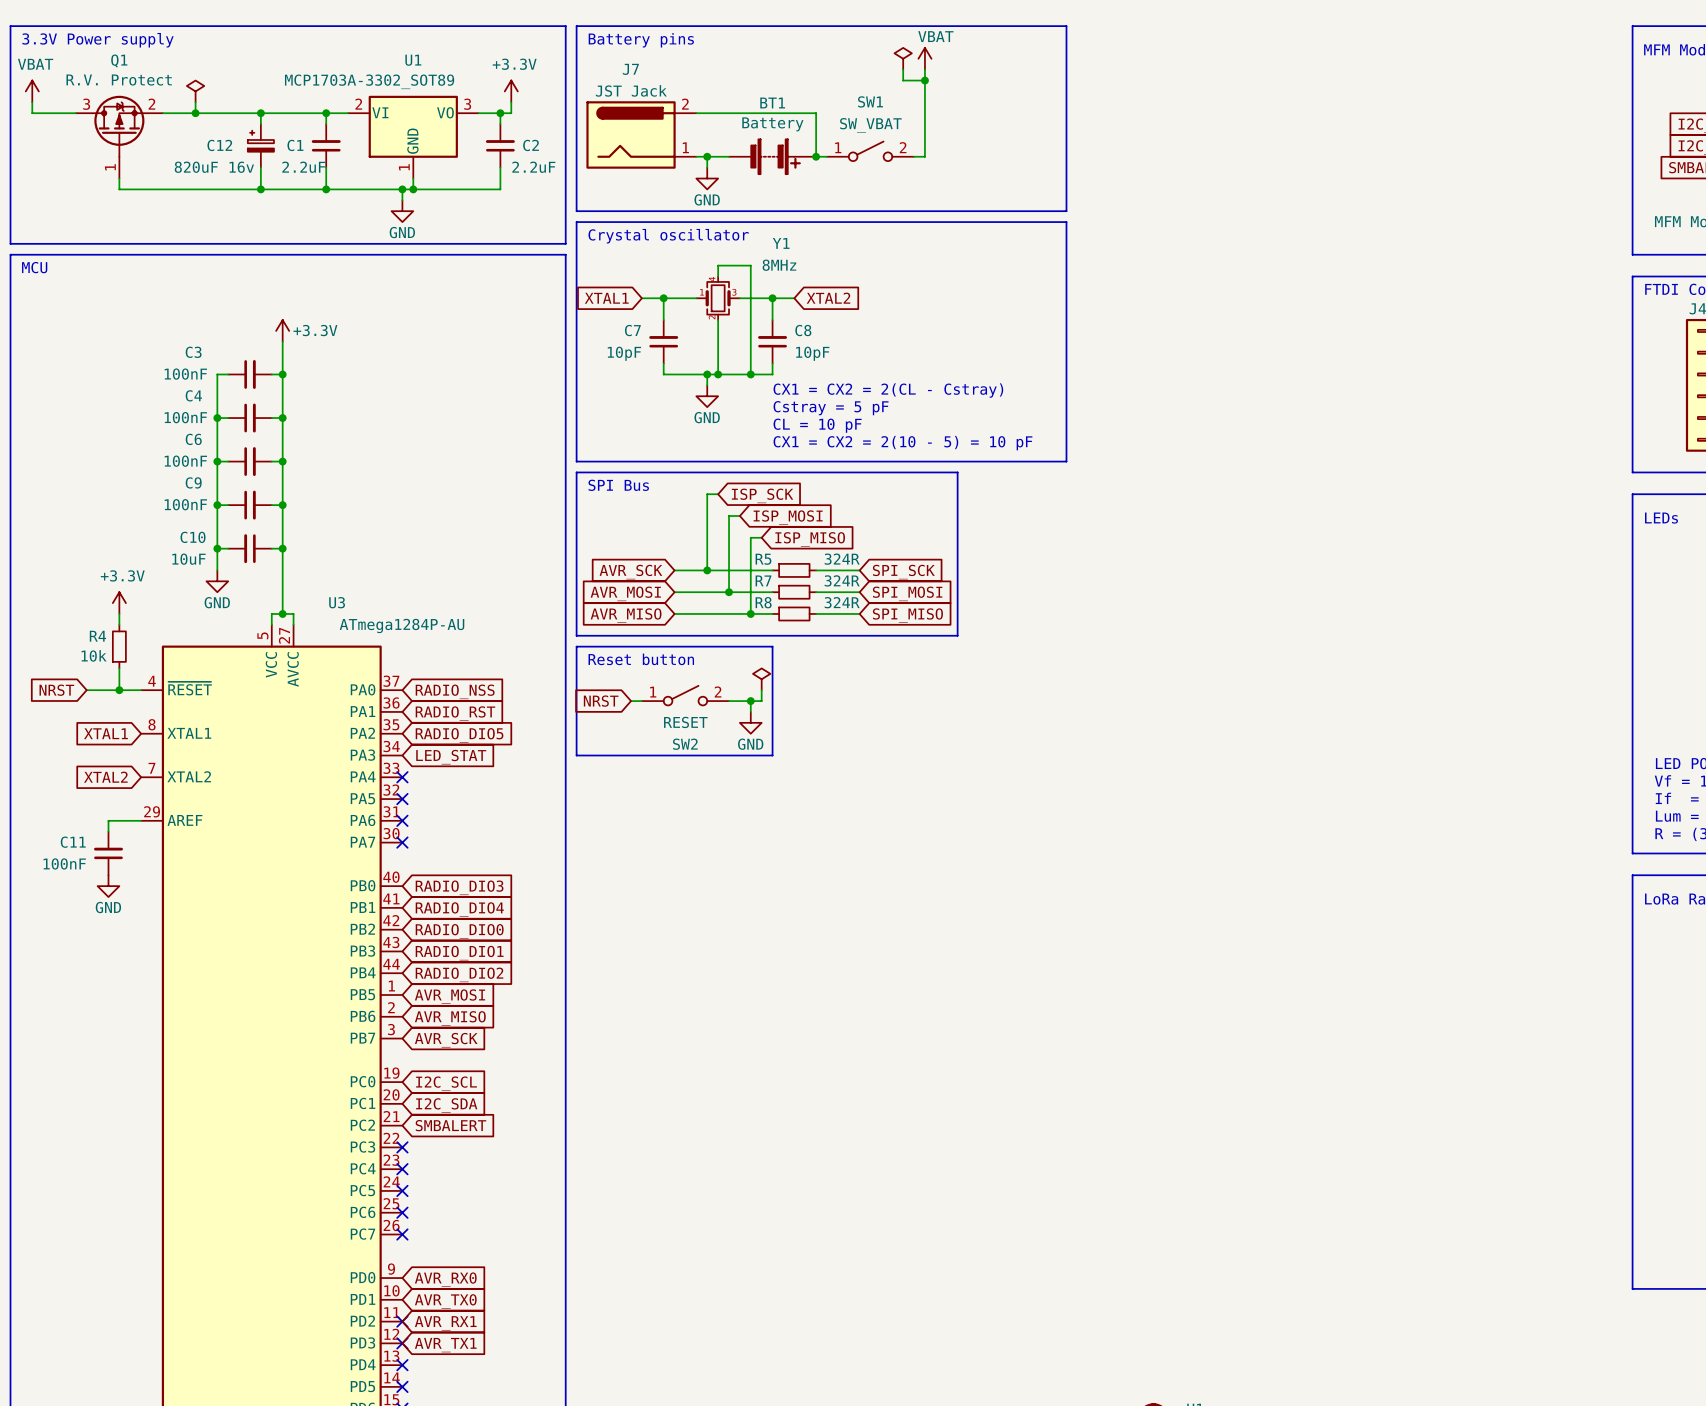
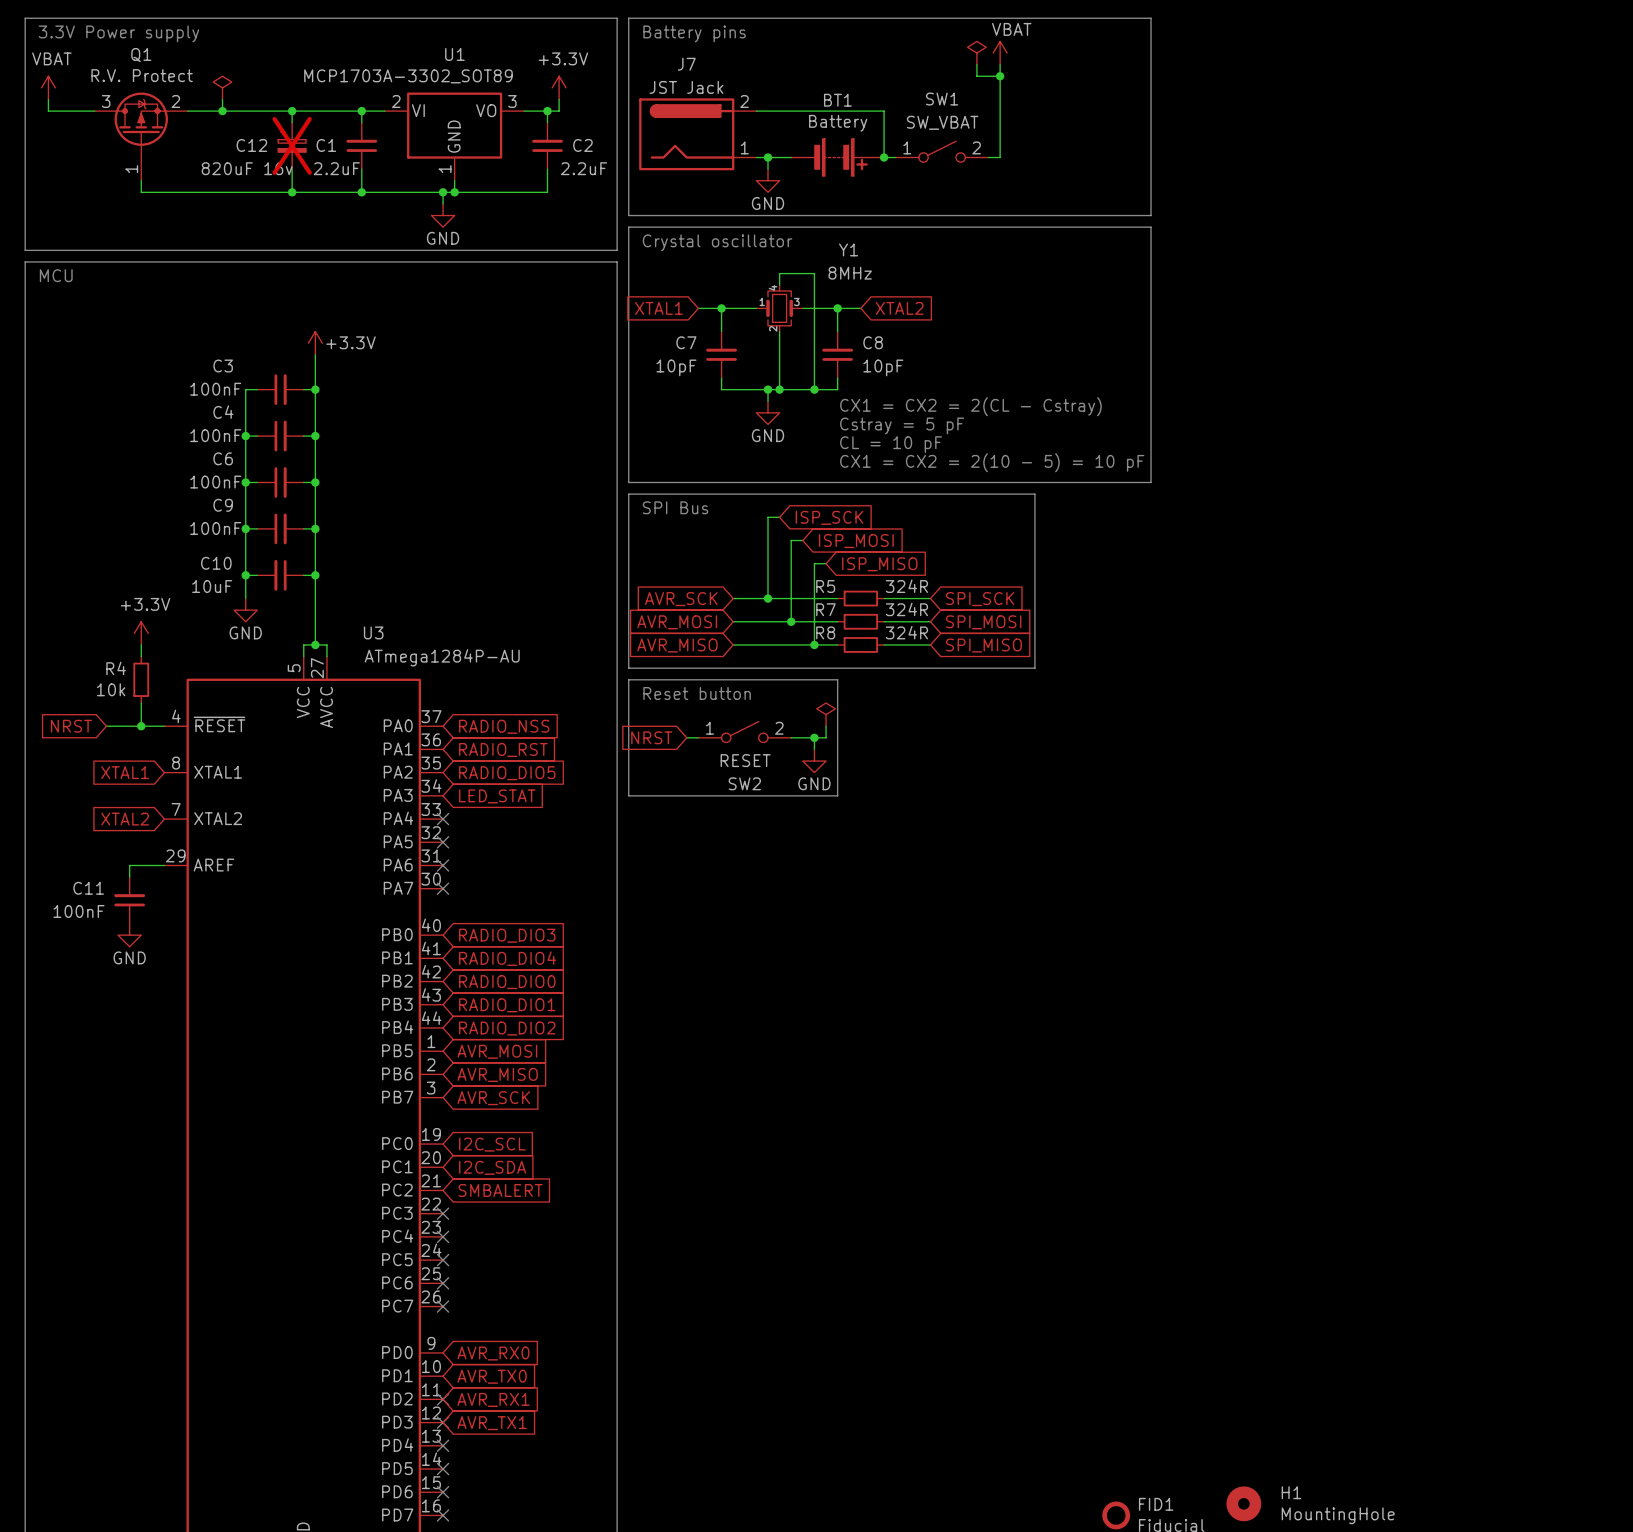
C12 do-not-place cross: none -> (292, 145)

